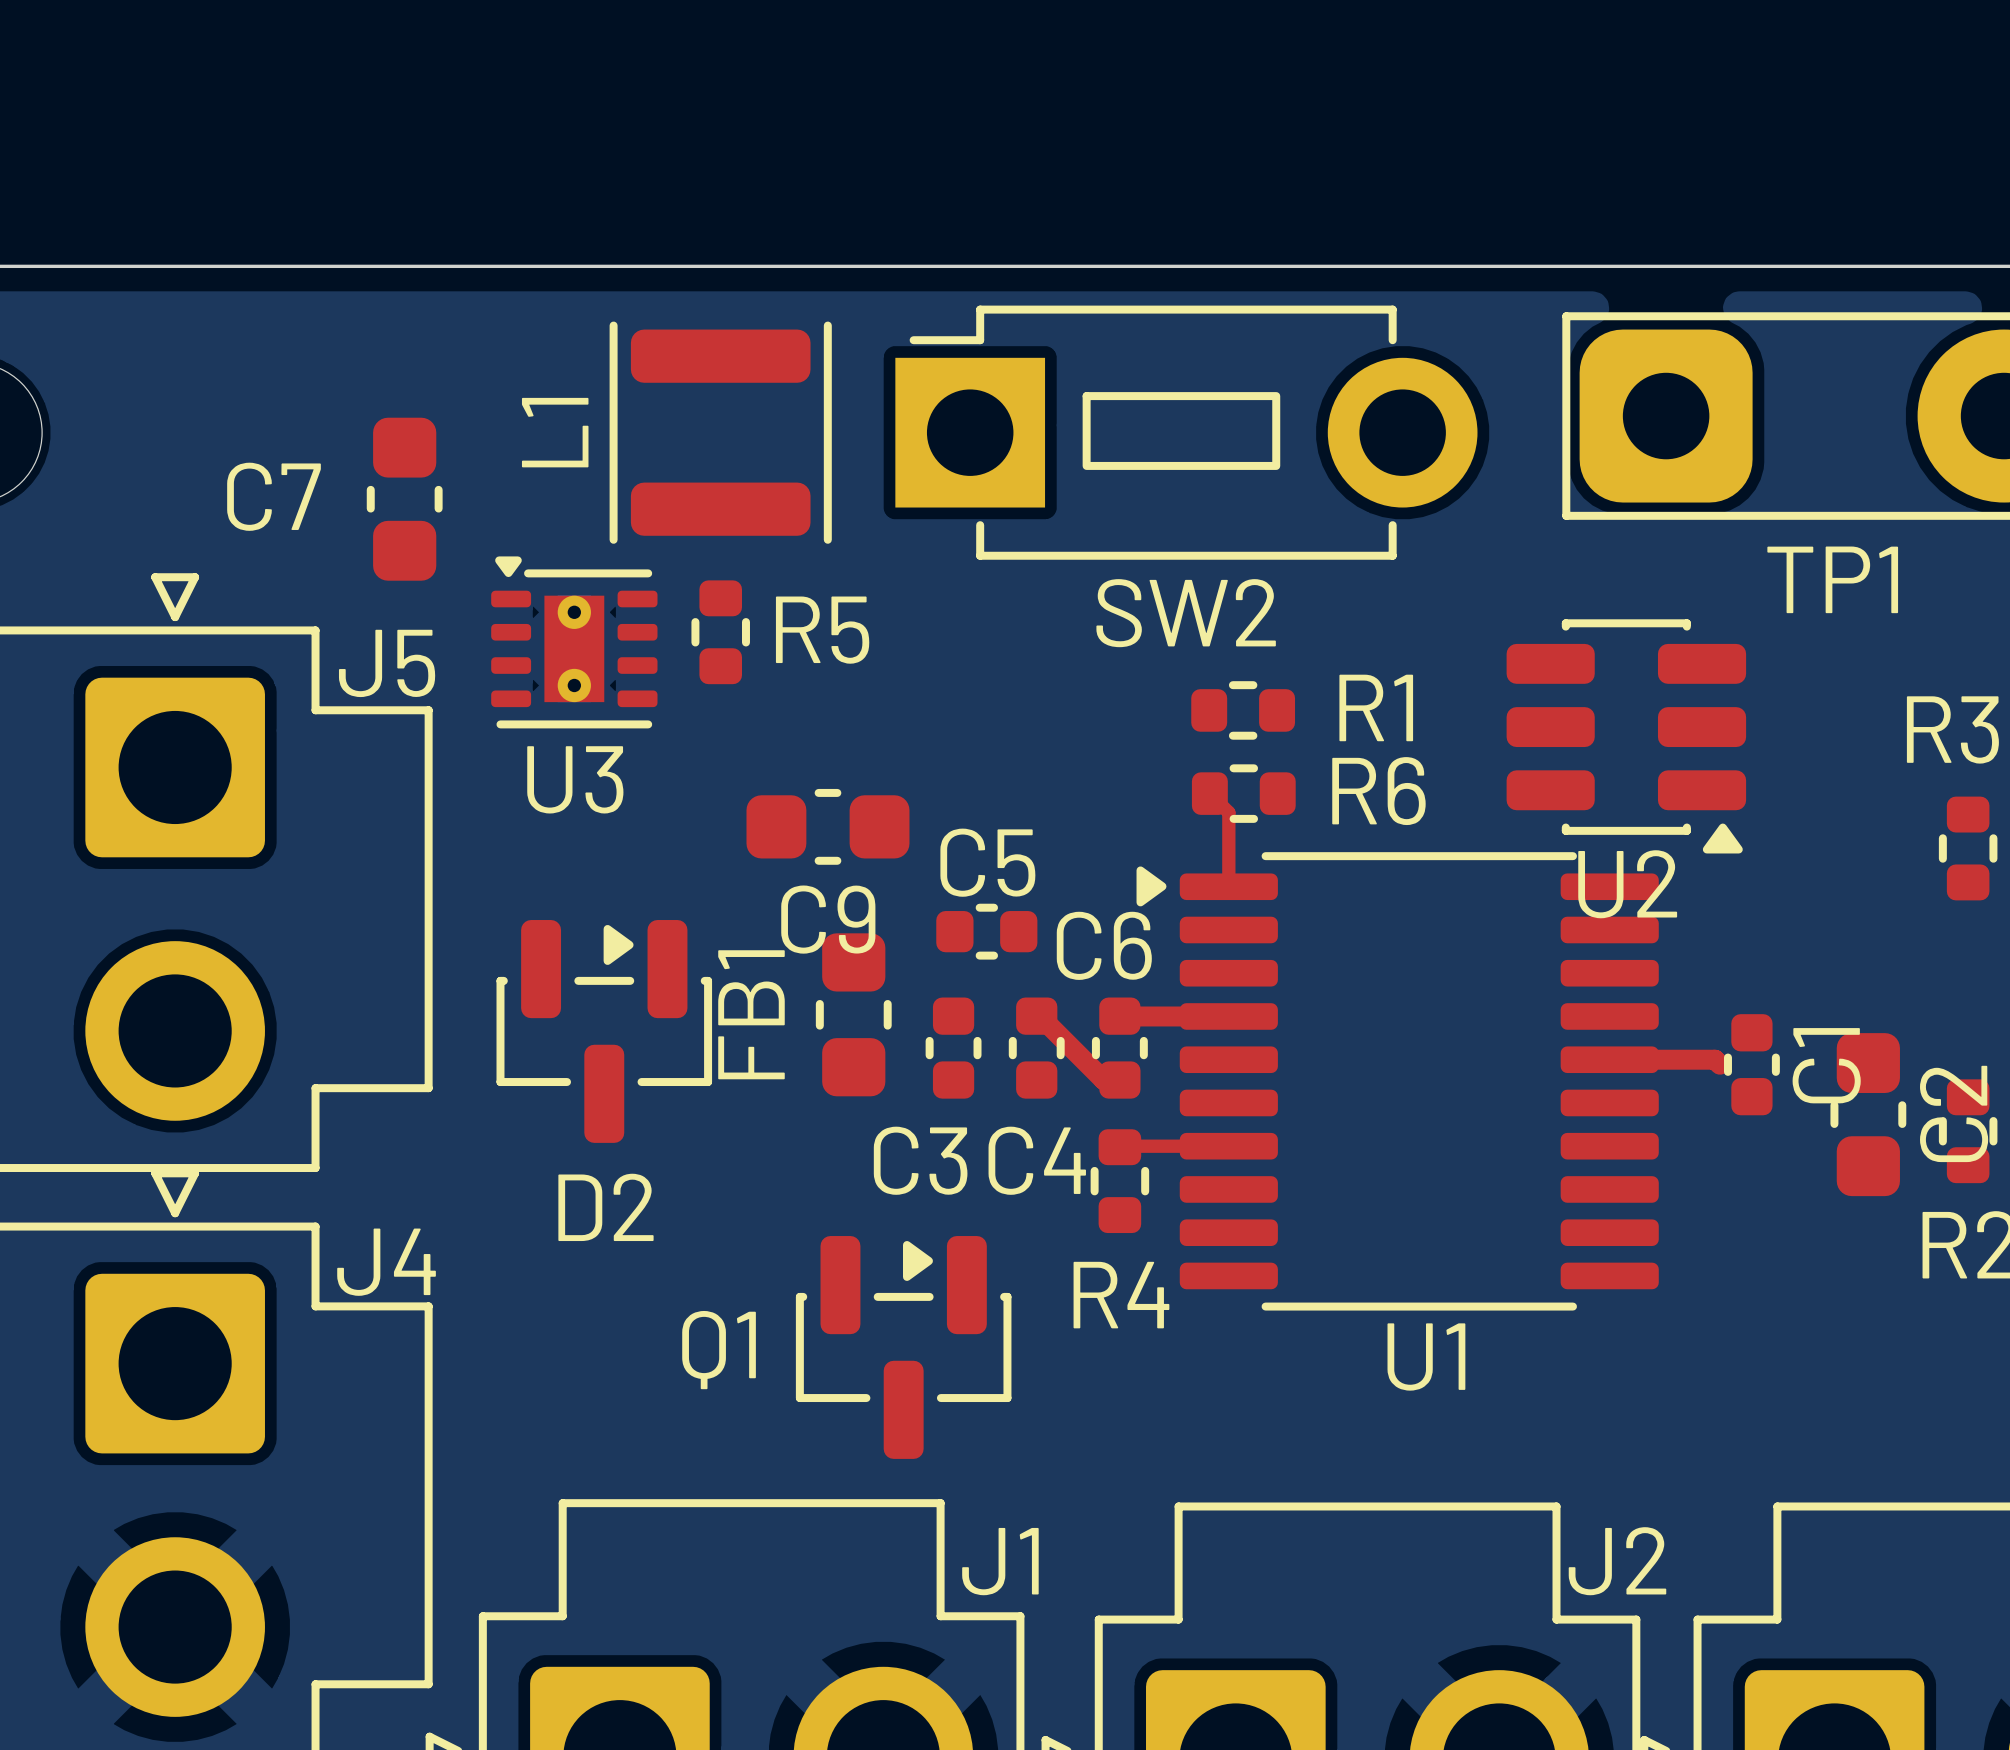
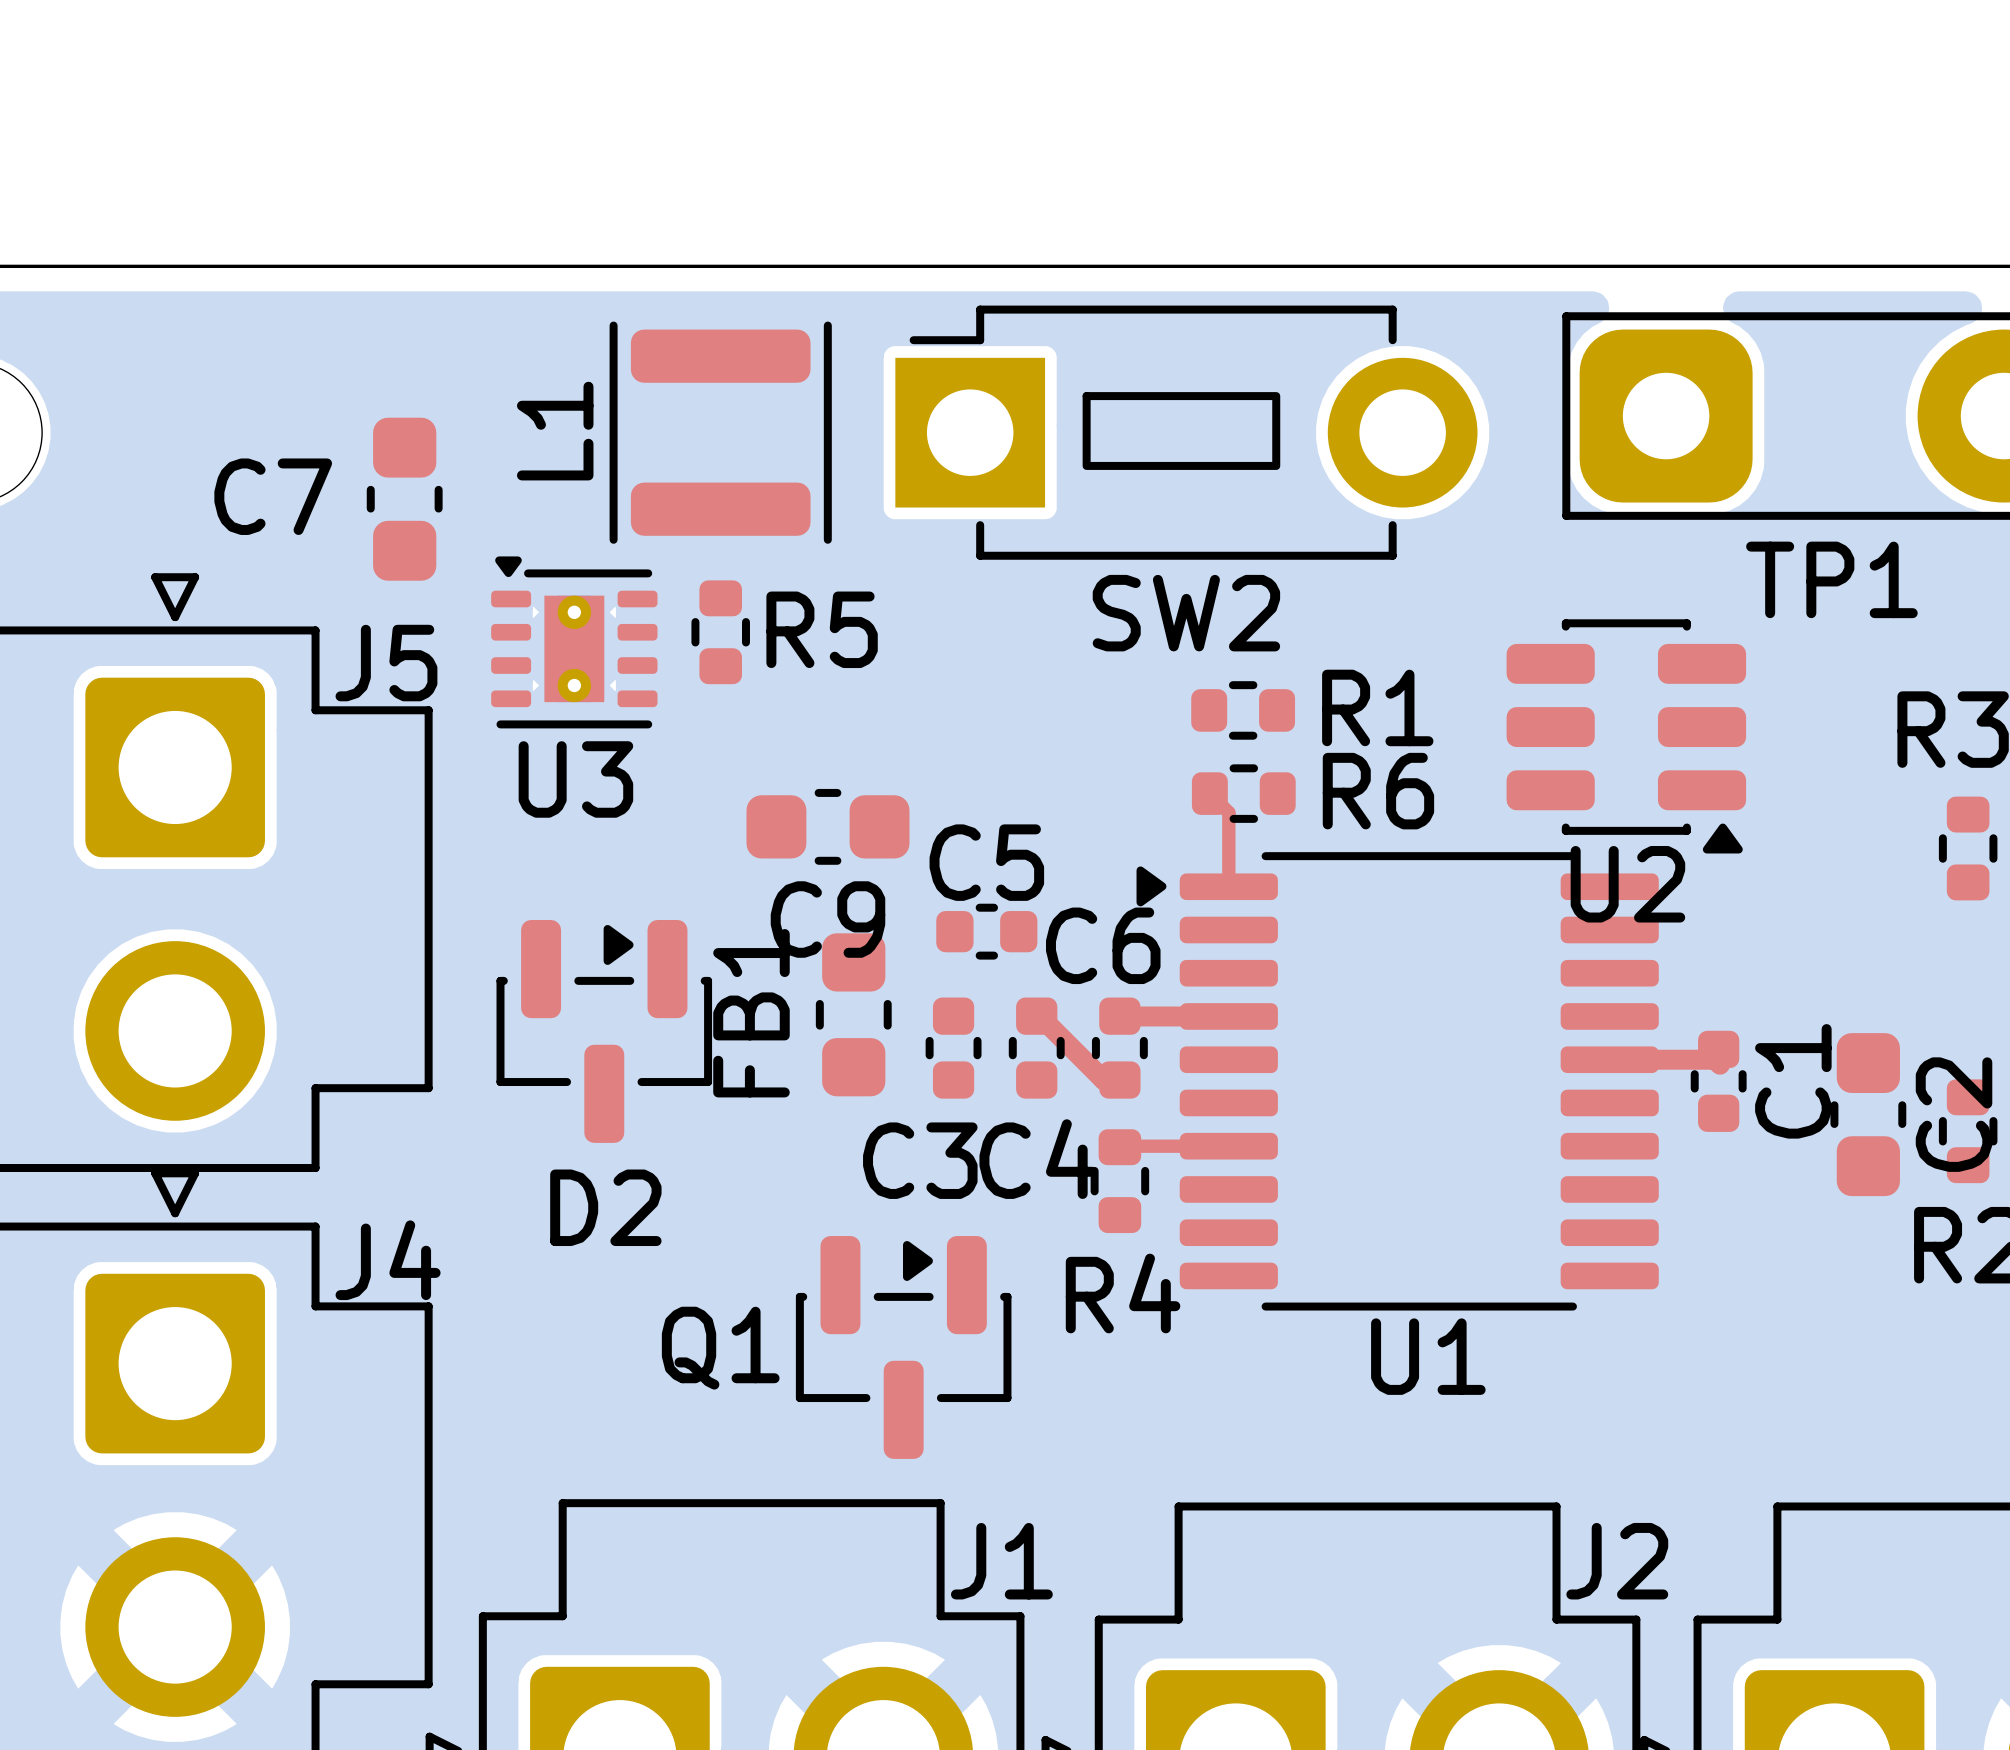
C1 position: (1751, 1064) -> (1718, 1081)

